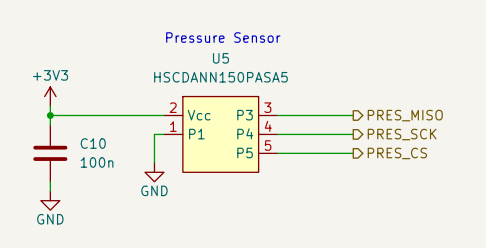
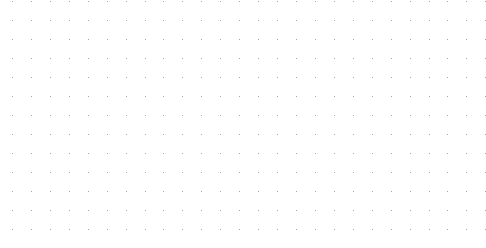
text: Pressure Sensor (223, 37) -> none
power symbol: +3V3 (50, 96) -> none
wire: (50, 106) (50, 124) -> none
wire: (50, 115) (163, 115) -> none
junction: (50, 115) -> none
wire: (277, 115) (353, 115) -> none
hierarchical label: PRES_MISO (405, 115) -> none
wire: (163, 134) (154, 134) (154, 162) -> none
U5: HSCDANN150PASA5 (220, 134) -> none
wire: (277, 134) (353, 134) -> none
hierarchical label: PRES_SCK (402, 134) -> none
C10: 100n (50, 153) -> none
wire: (277, 153) (353, 153) -> none
hierarchical label: PRES_CS (397, 153) -> none
power symbol: GND (154, 172) -> none
wire: (50, 181) (50, 191) -> none
power symbol: GND (50, 200) -> none

